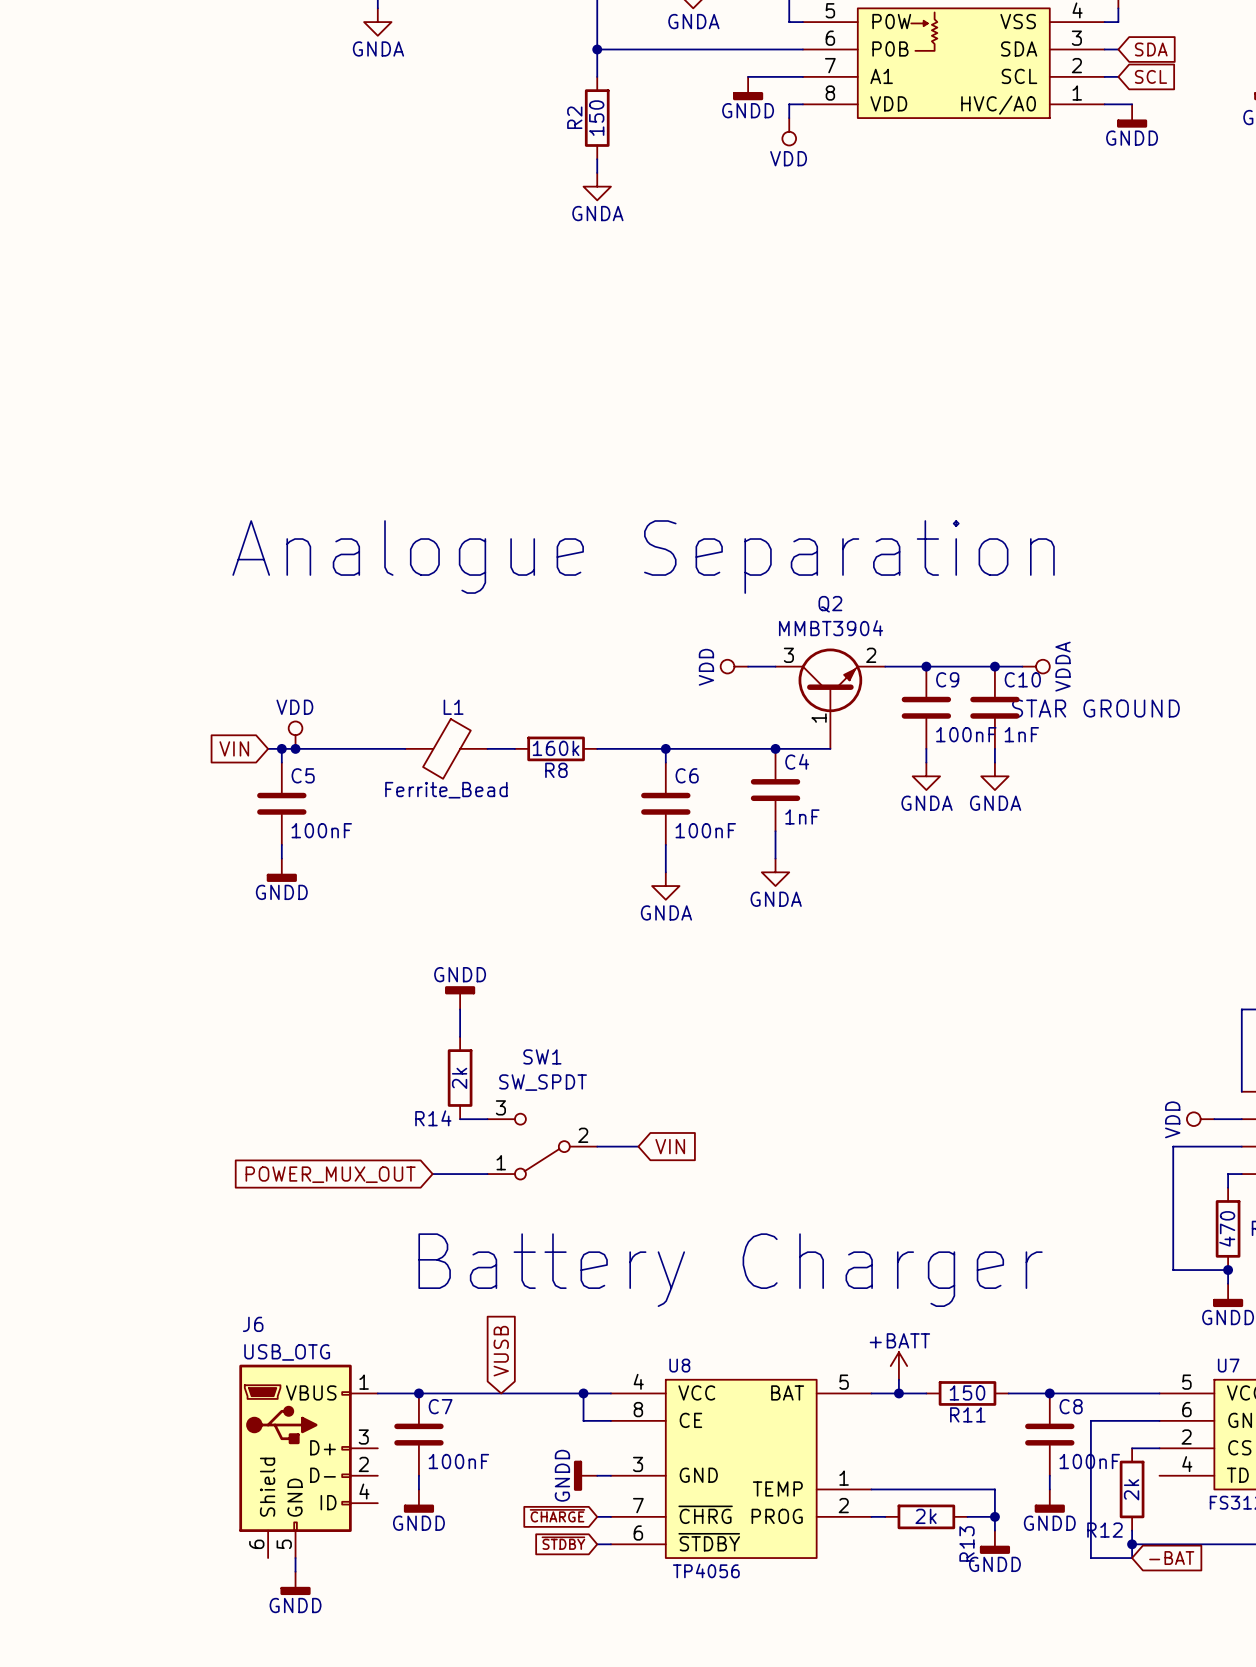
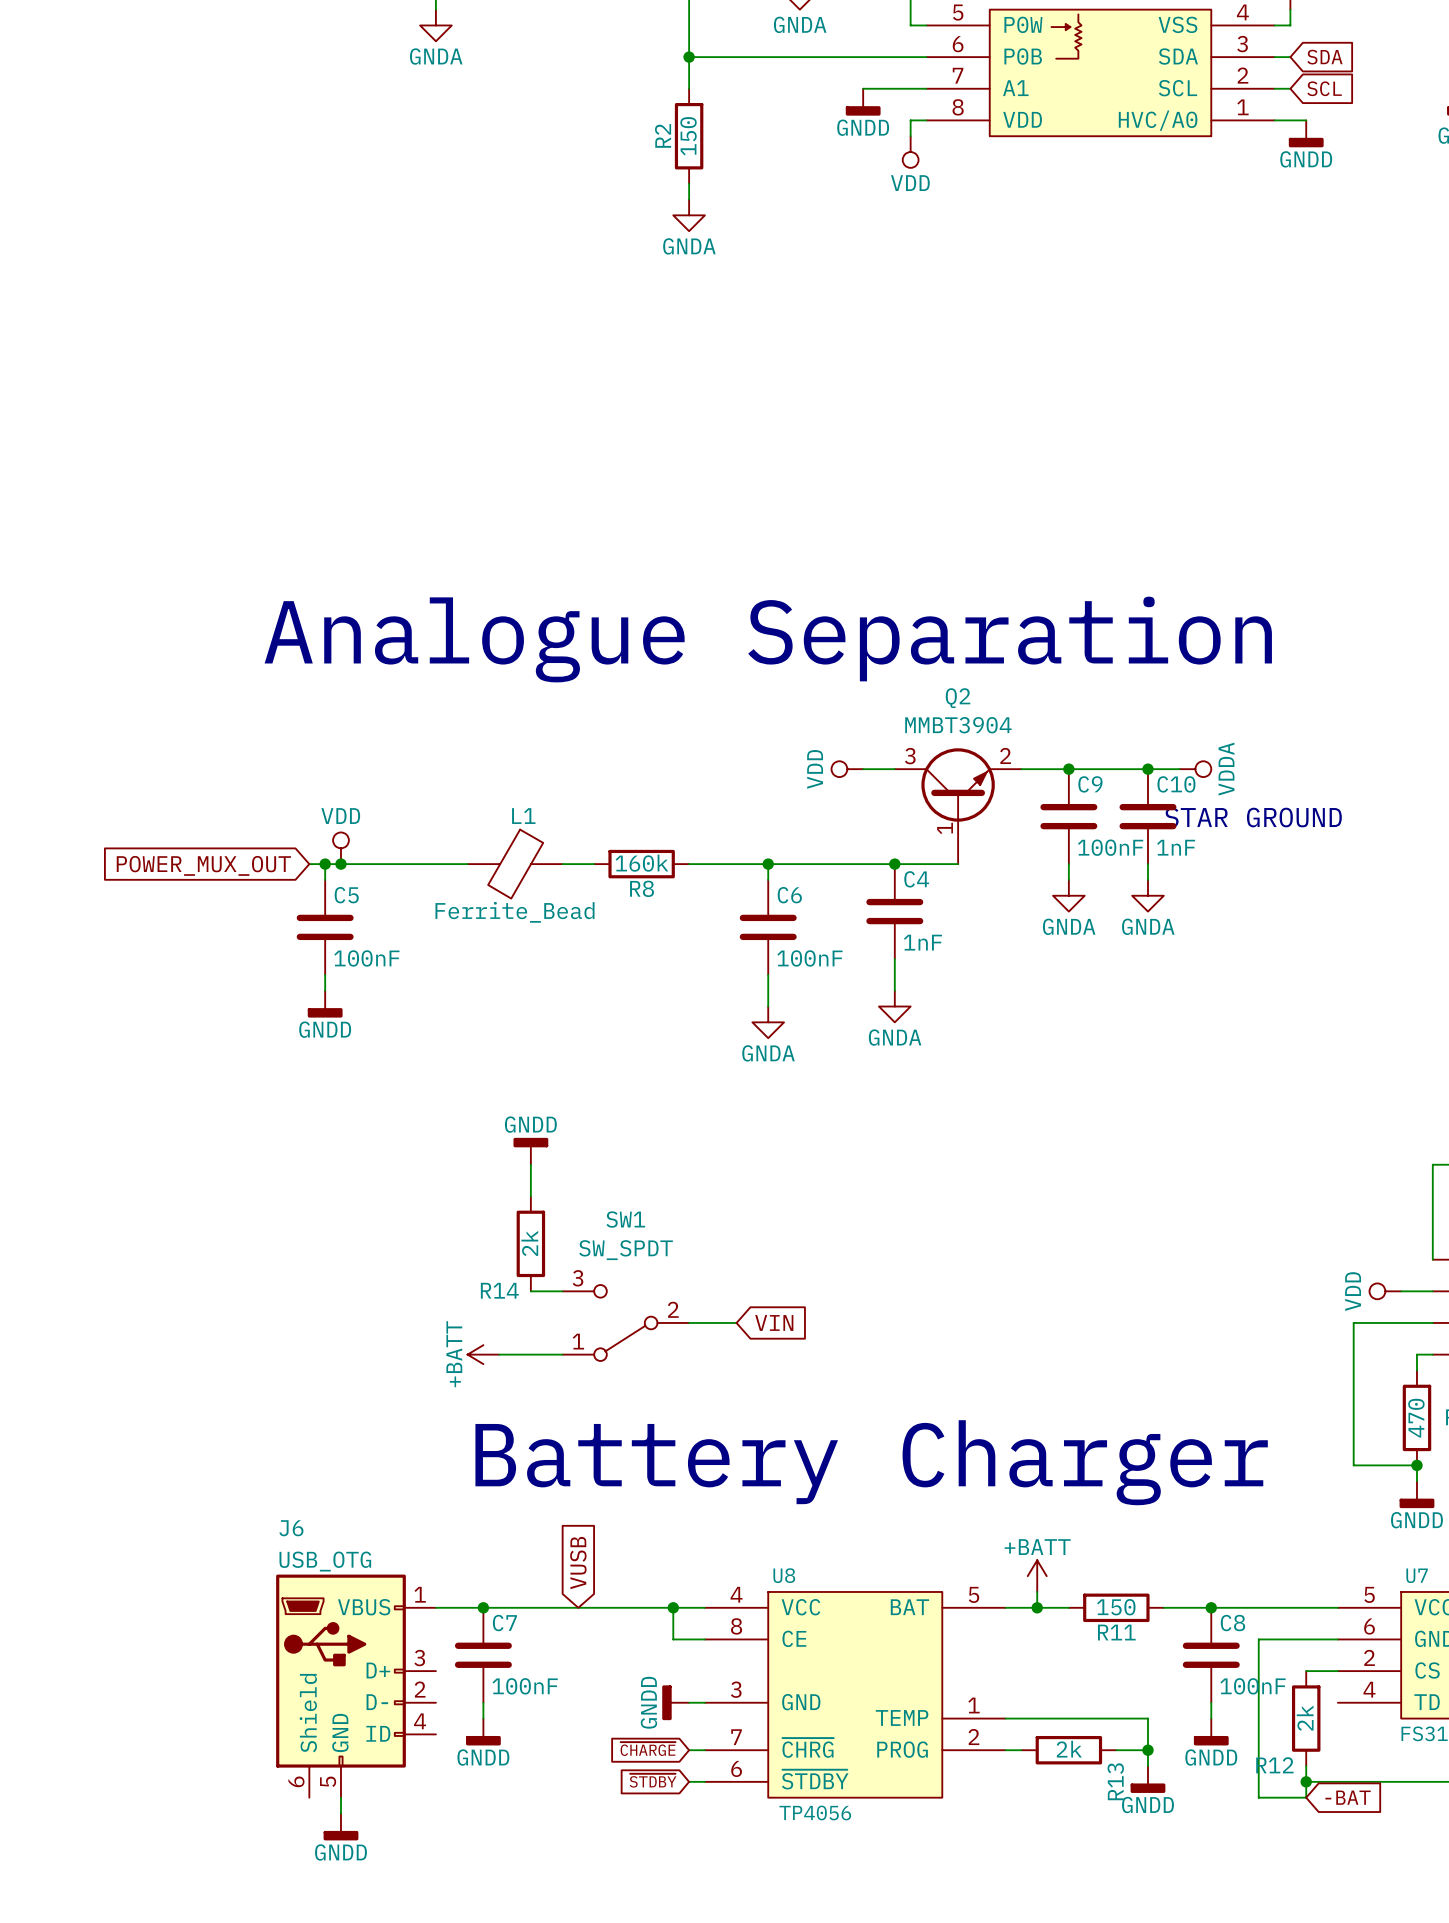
global label: VIN (234, 748) -> POWER_MUX_OUT (203, 865)
global label: POWER_MUX_OUT (330, 1174) -> none
power symbol: none -> +BATT (483, 1354)

